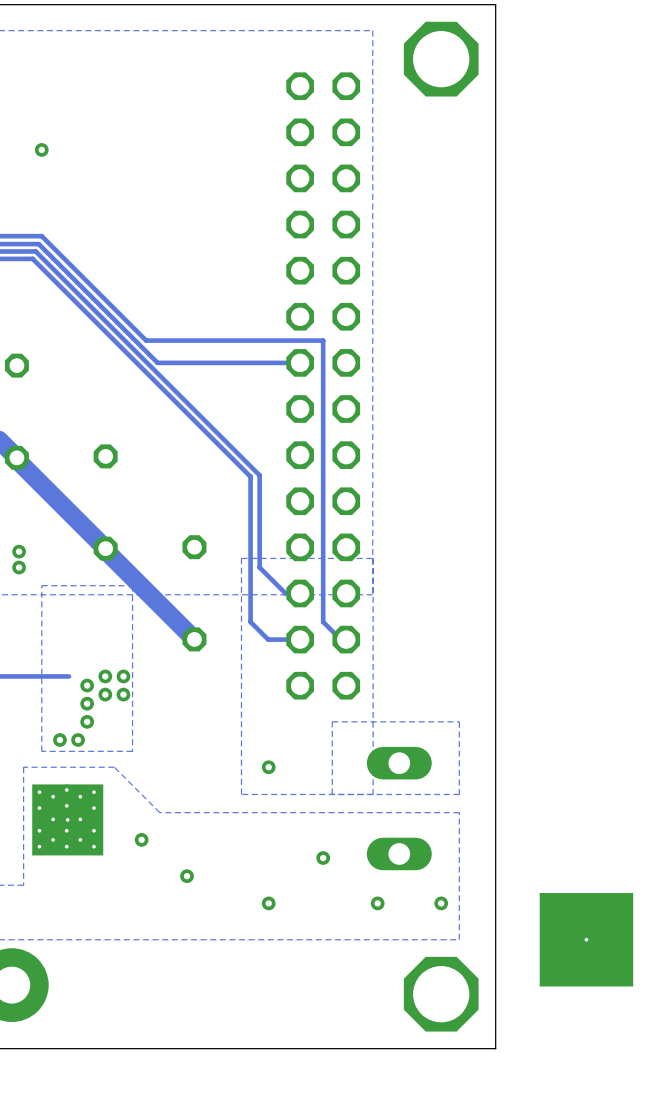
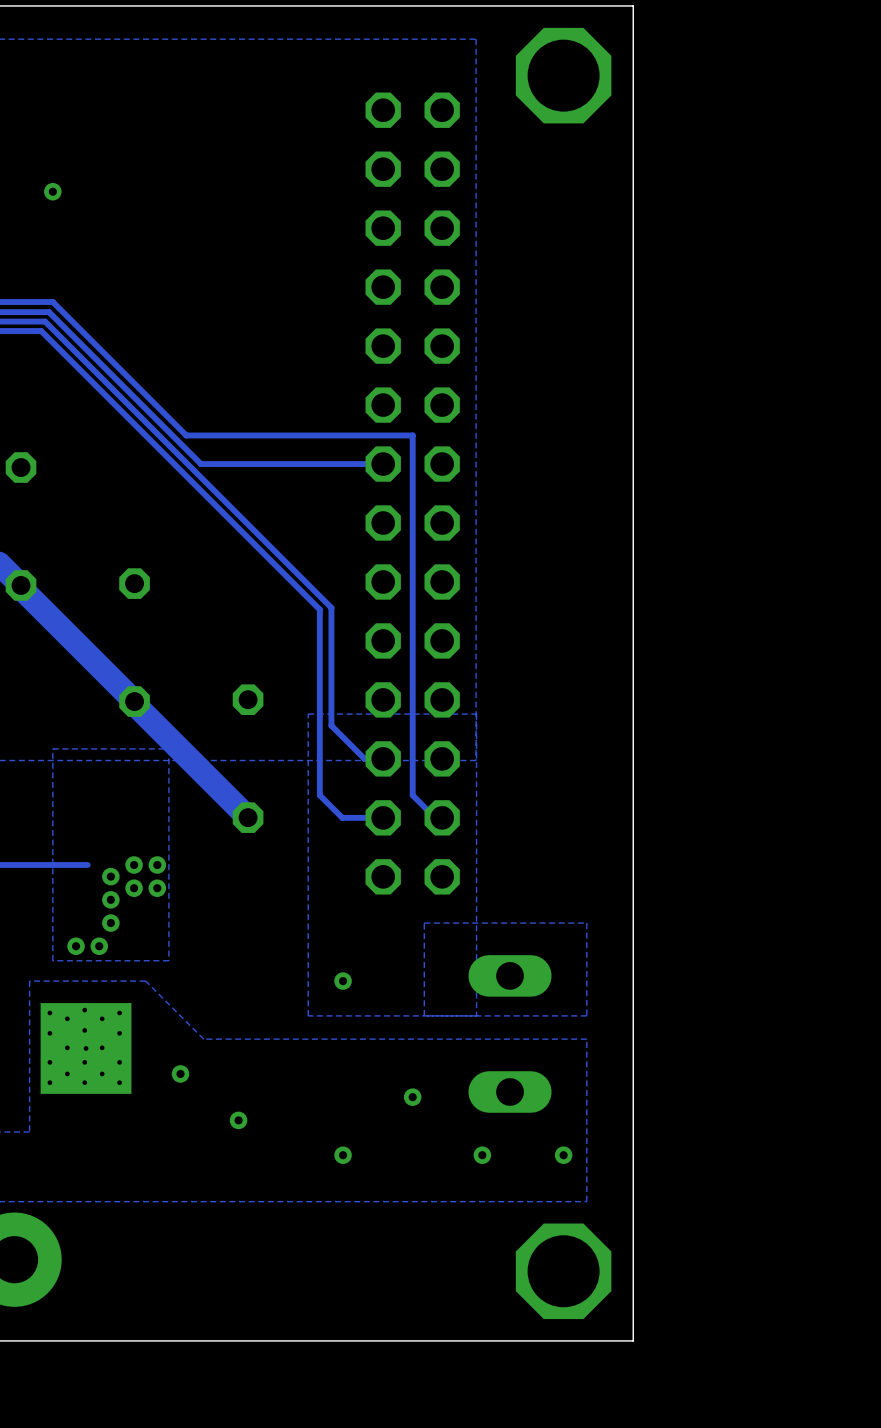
via: (19, 551) -> none
via: (19, 567) -> none
part: (586, 939) -> none

